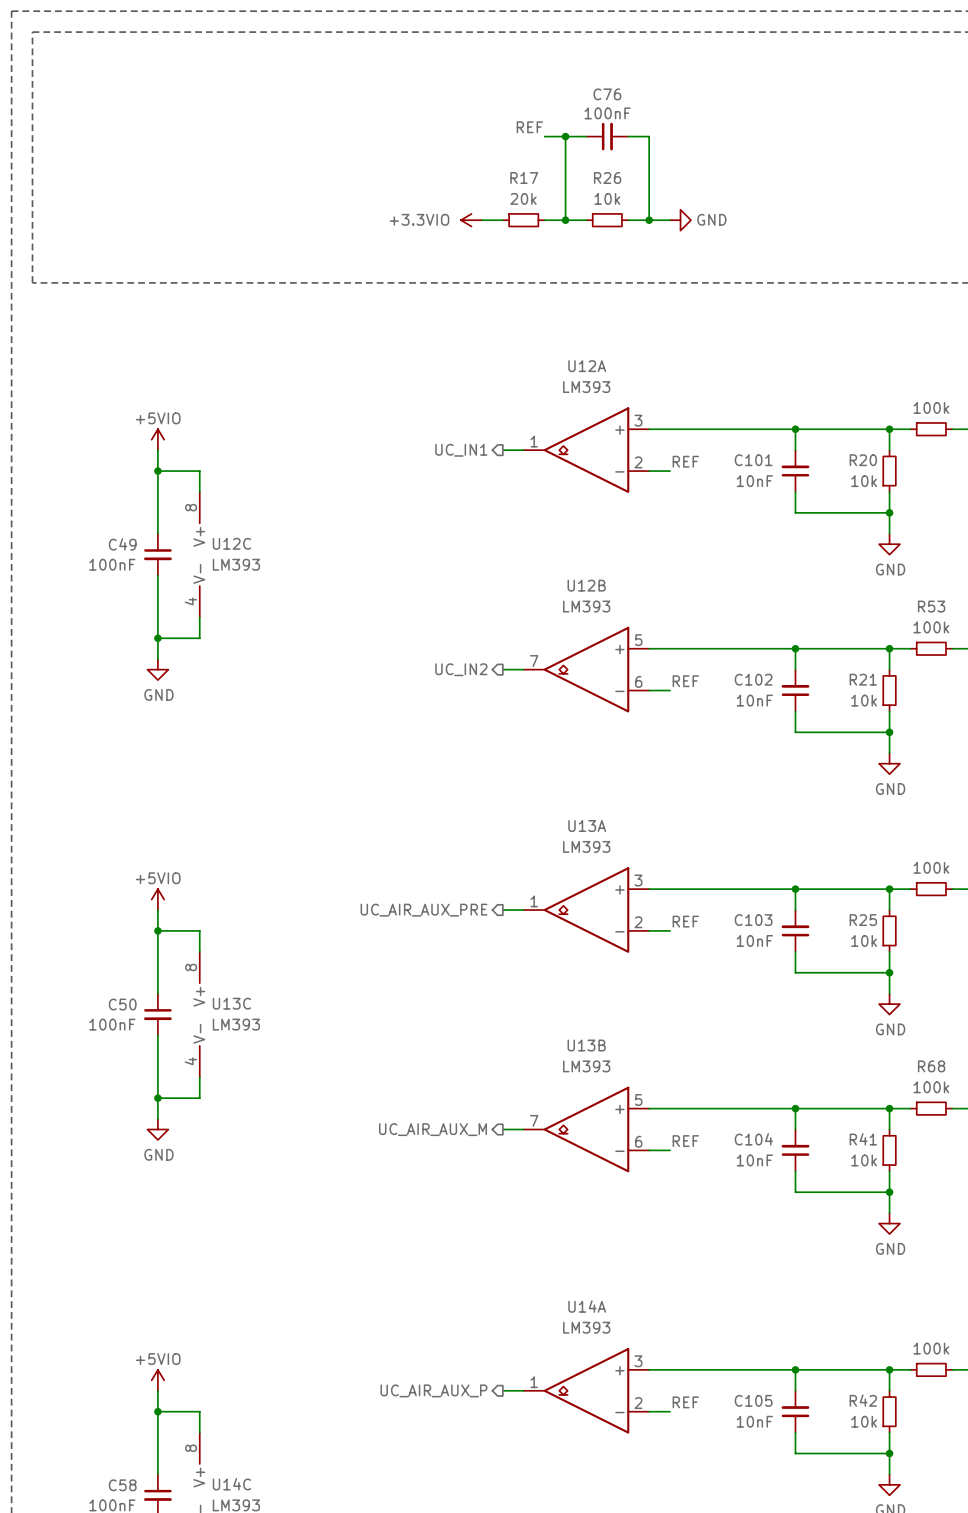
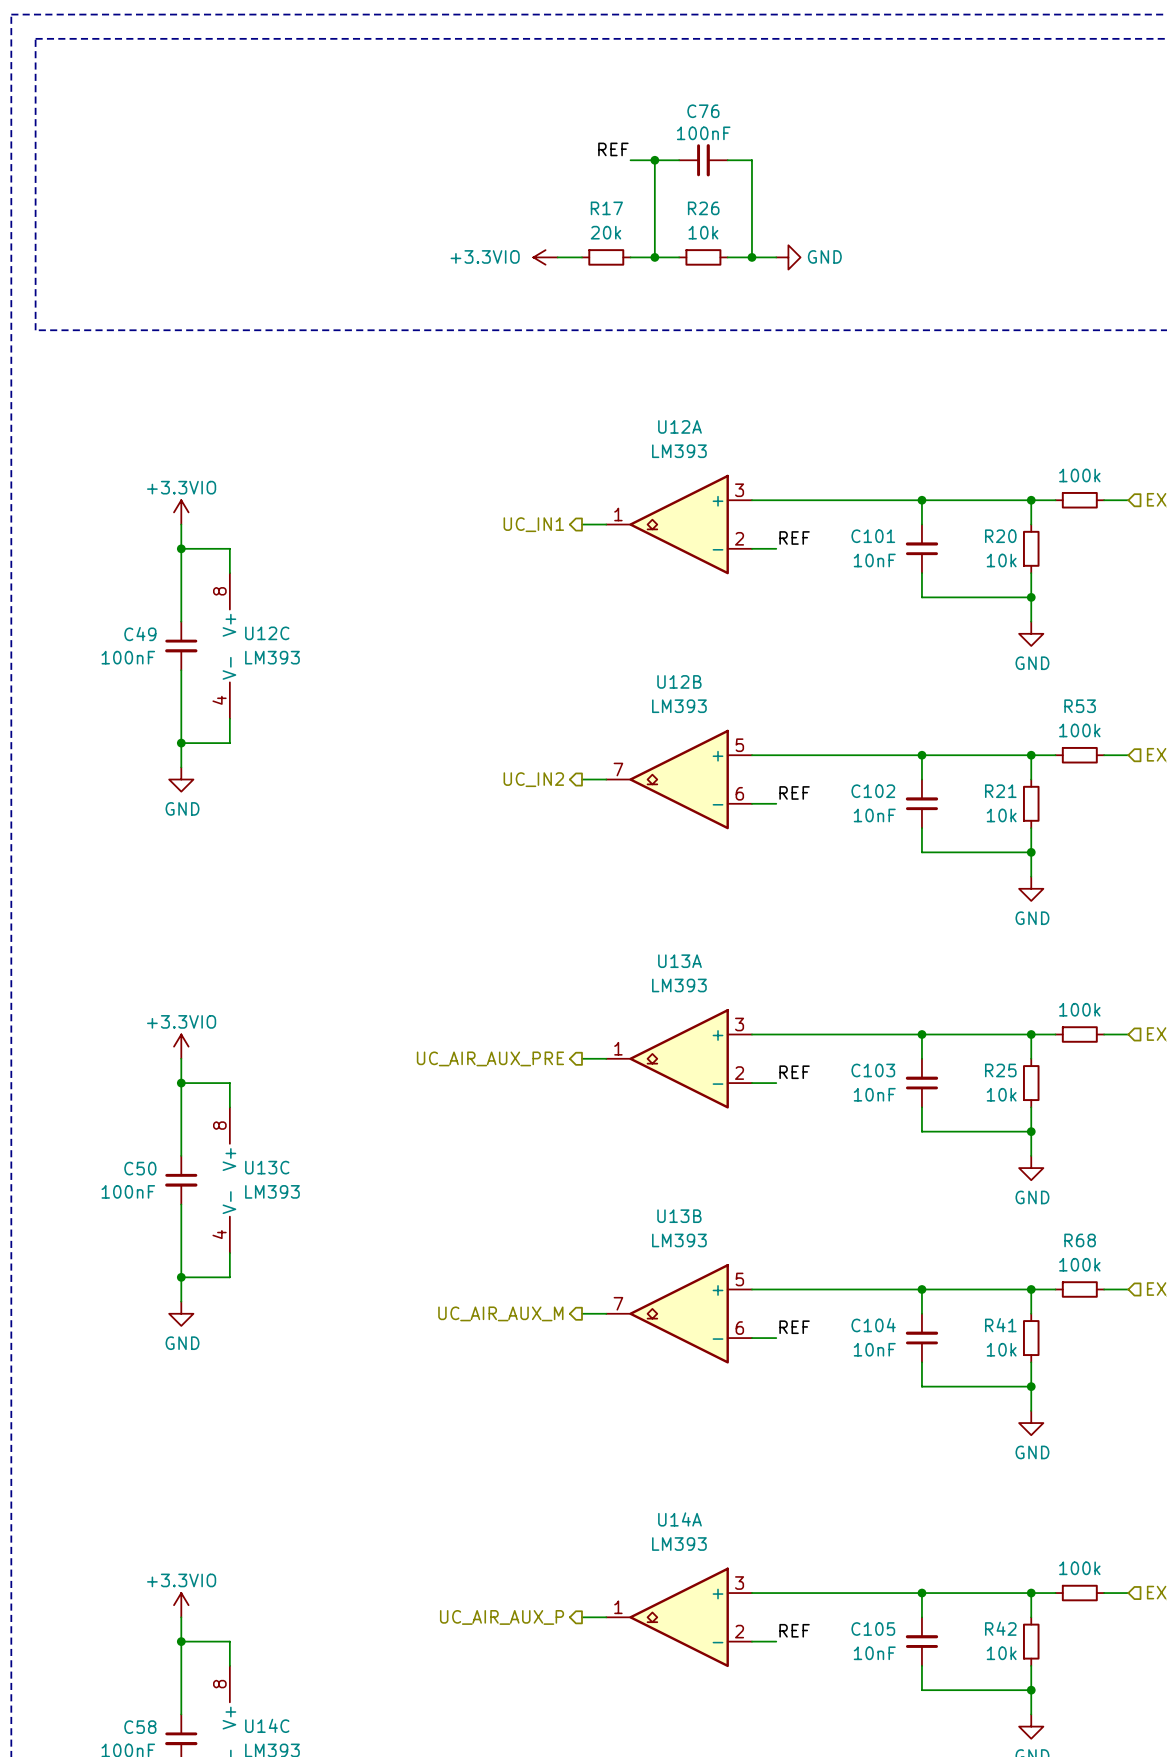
power symbol: +5VIO (157, 439) -> +3.3VIO (181, 512)
power symbol: +5VIO (157, 899) -> +3.3VIO (181, 1046)
power symbol: +5VIO (157, 1380) -> +3.3VIO (181, 1605)

